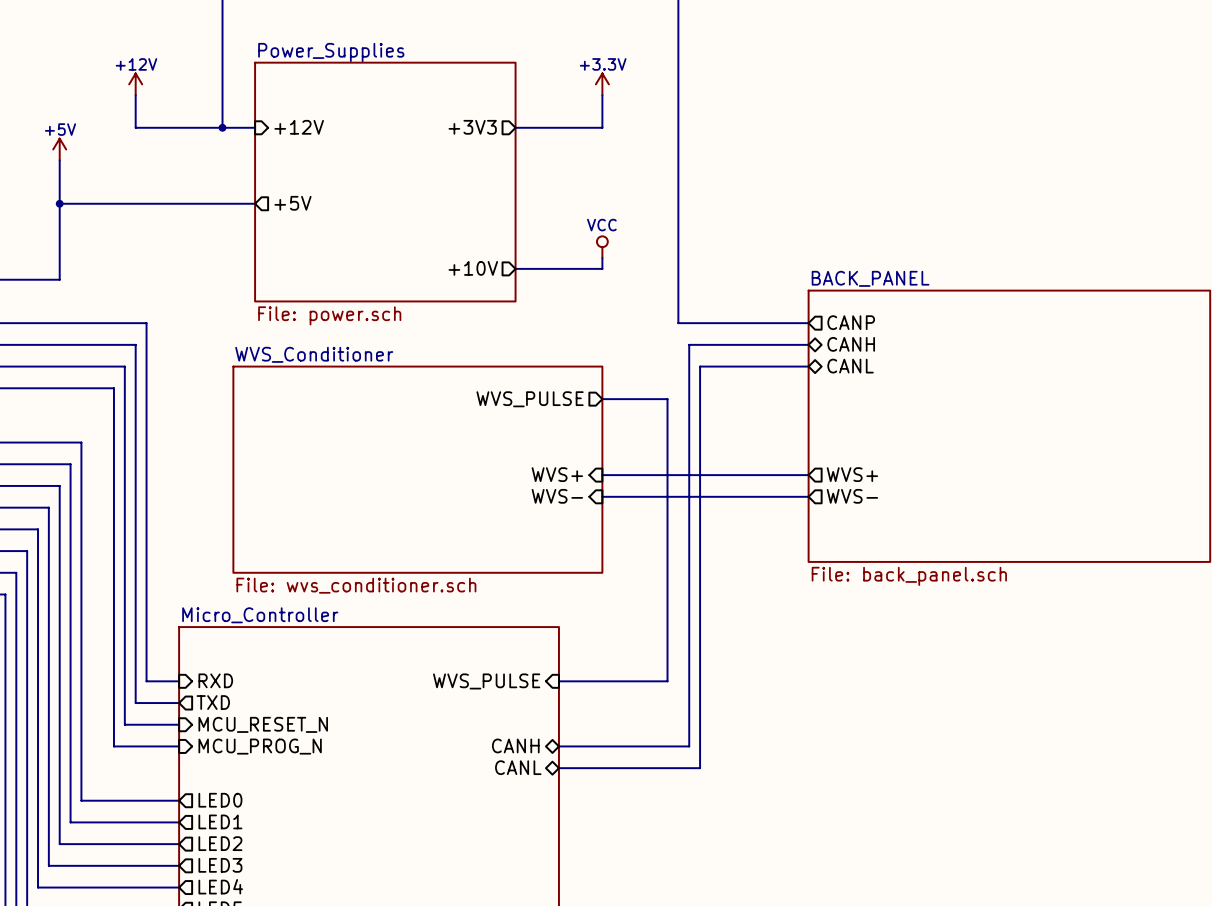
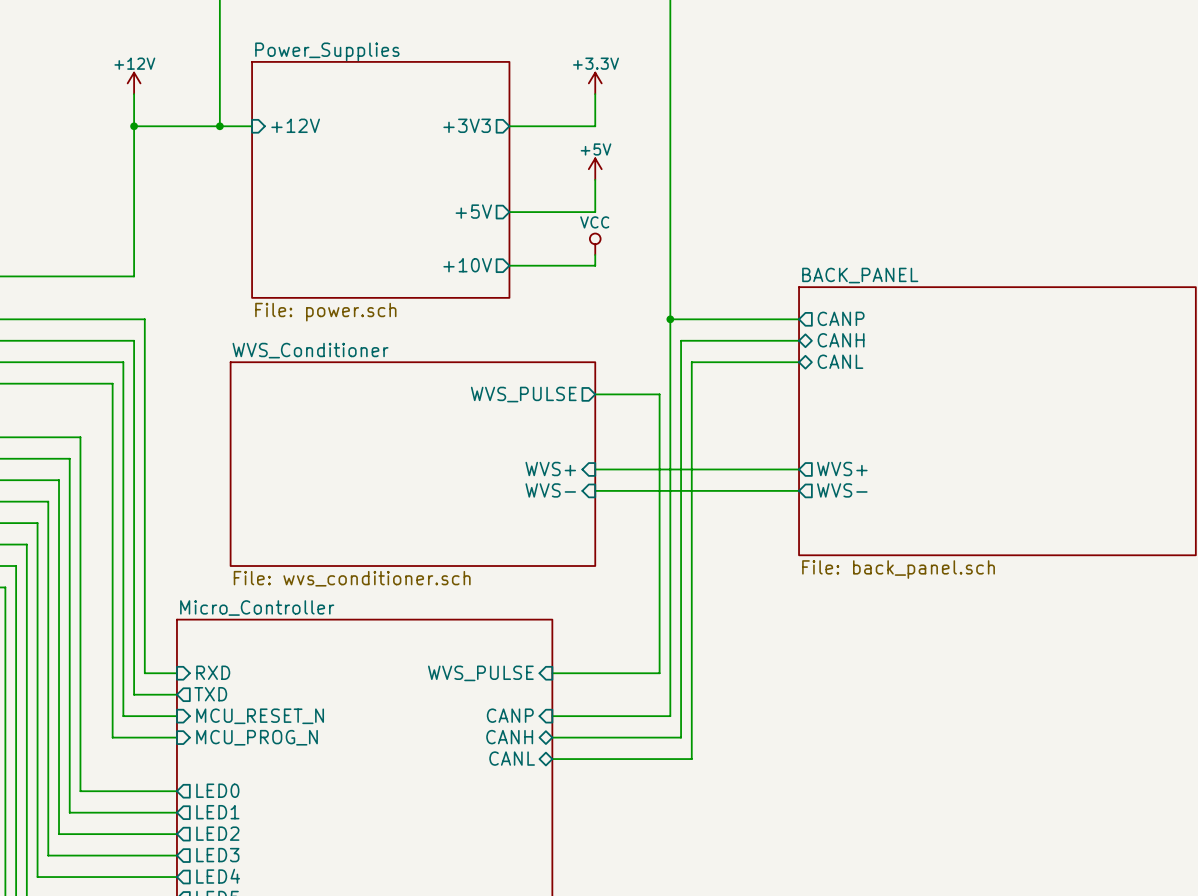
junction: none -> (134, 126)
power symbol: +5V (59, 149) -> none
wire: (59, 160) (59, 279) -> (134, 126) (134, 276) (59, 276)
power symbol: none -> +5V (595, 169)
wire: none -> (595, 179) (595, 212) (509, 212)
wire: (59, 203) (255, 203) -> none
junction: (59, 203) -> none
sheet pin: +5V (292, 203) -> none
sheet pin: none -> +5V (473, 211)
wire: none -> (670, 319) (670, 716) (552, 716)
junction: none -> (670, 319)
sheet pin: none -> CANP (510, 715)

